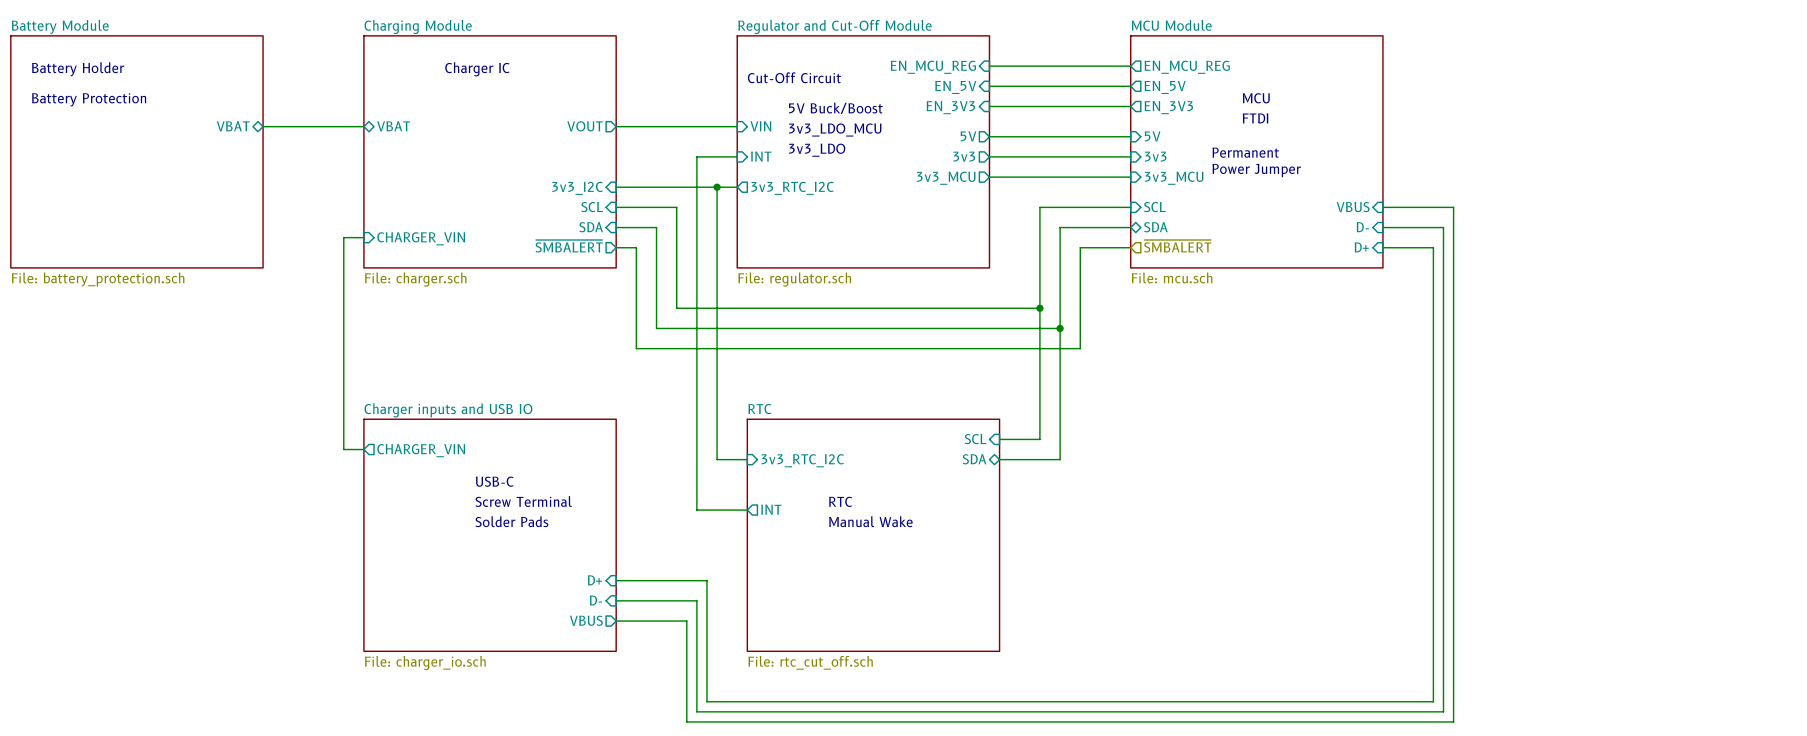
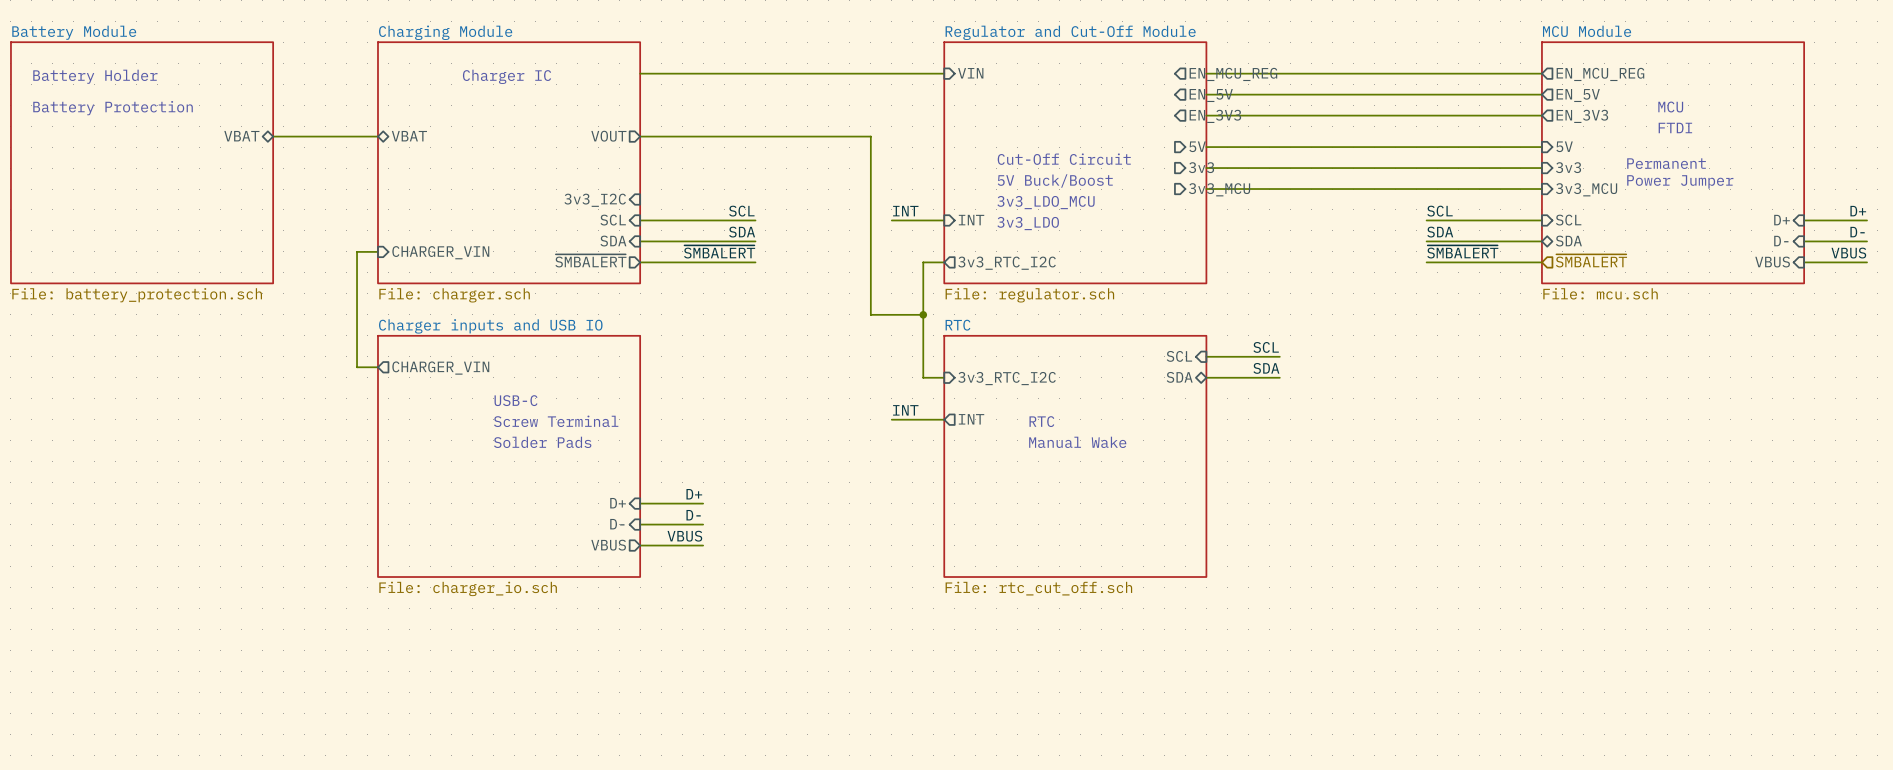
wire: none -> (640, 73) (944, 73)
wire: (989, 66) (1130, 66) -> none
wire: none -> (1206, 73) (1541, 73)
sheet pin: EN_MCU_REG (933, 67) -> none
sheet pin: none -> EN_MCU_REG (1600, 74)
text: Cut-Off Circuit (794, 77) -> none
wire: (989, 86) (1130, 86) -> none
wire: none -> (1206, 94) (1541, 94)
sheet pin: EN_5V (955, 87) -> none
sheet pin: none -> EN_5V (1578, 95)
text: MCU (1256, 98) -> none
text: none -> MCU (1670, 107)
wire: (989, 106) (1130, 106) -> none
wire: none -> (1206, 115) (1541, 115)
sheet pin: EN_3V3 (950, 107) -> none
sheet pin: none -> EN_3V3 (1582, 116)
text position: 5V Buck/Boost (835, 108) -> 5V Buck/Boost (1055, 180)
text: FTDI (1255, 118) -> none
text: none -> FTDI (1675, 127)
wire: none -> (765, 136) (870, 136) (870, 314) (923, 314)
sheet pin position: VIN (760, 126) -> VIN (970, 73)
text position: 3v3_LDO_MCU (835, 130) -> 3v3_LDO_MCU (1046, 202)
sheet pin: 5V (968, 136) -> none
wire: (989, 136) (1130, 136) -> none
wire: none -> (1206, 147) (1541, 147)
sheet pin: none -> 5V (1564, 146)
text: none -> Cut-Off Circuit (1064, 159)
text position: 3v3_LDO (817, 150) -> 3v3_LDO (1028, 223)
sheet Regulator and Cut-Off Module position: (863, 151) -> (1075, 162)
sheet MCU Module: File: mcu.sch (1256, 151) -> none
sheet MCU Module: none -> File: mcu.sch (1673, 162)
text: Permanent (1245, 152) -> none
text: none -> Permanent (1666, 163)
wire: (737, 156) (696, 156) (696, 510) (747, 510) -> none
sheet pin: INT (761, 156) -> none
sheet pin: 3v3 (964, 156) -> none
wire: (989, 156) (1130, 156) -> none
wire: none -> (1206, 168) (1541, 168)
sheet pin: none -> 3v3 (1568, 167)
text: Power Jumper (1256, 170) -> none
text: none -> Power Jumper (1680, 181)
wire: (989, 177) (1130, 177) -> none
wire: none -> (1206, 189) (1541, 189)
sheet pin: 3v3_MCU (946, 178) -> none
sheet pin: none -> 3v3_MCU (1586, 189)
wire: (616, 187) (737, 187) -> none
wire: (717, 187) (717, 459) (747, 459) -> none
junction: (717, 187) -> none
sheet pin: 3v3_RTC_I2C (792, 188) -> none
label: none -> SCL (741, 211)
label: none -> INT (905, 211)
label: none -> SCL (1439, 211)
label: none -> D+ (1858, 211)
wire: (676, 207) (676, 308) (1039, 308) -> (703, 220) (755, 220)
wire: none -> (891, 220) (944, 220)
sheet pin: none -> INT (971, 220)
wire: (1130, 207) (1039, 207) (1039, 439) (999, 439) -> none
sheet pin: SCL (1154, 207) -> none
sheet pin: VBUS (1353, 207) -> none
wire: none -> (1426, 220) (1437, 220)
wire: (1453, 207) (1453, 721) (686, 721) (686, 621) (616, 621) -> (1510, 220) (1541, 220)
sheet pin: none -> SCL (1568, 220)
sheet pin: none -> D+ (1782, 220)
wire: none -> (1804, 220) (1867, 220)
label: none -> SDA (742, 232)
label: none -> SDA (1440, 232)
label: none -> D- (1857, 232)
wire: (656, 227) (656, 328) (1060, 328) -> (682, 241) (755, 241)
wire: (1130, 227) (1060, 227) (1060, 459) (999, 459) -> none
sheet pin: SDA (1155, 227) -> none
sheet pin: D- (1362, 227) -> none
wire: none -> (1426, 241) (1437, 241)
wire: (1443, 227) (1443, 711) (696, 711) (696, 600) (616, 600) -> (1500, 241) (1541, 241)
sheet pin: none -> SDA (1568, 241)
sheet pin: none -> D- (1781, 241)
wire: none -> (1804, 241) (1867, 241)
label: none -> ~{SMBALERT} (719, 251)
label: none -> ~{SMBALERT} (1462, 251)
label: none -> VBUS (1848, 253)
hierarchical label: ~{SMBALERT} (1177, 246) -> none
hierarchical label: none -> ~{SMBALERT} (1591, 260)
wire: (636, 247) (636, 348) (1080, 348) (1080, 247) (1130, 247) -> (661, 262) (755, 262)
wire: none -> (944, 262) (923, 262) (923, 377) (944, 377)
sheet pin: D+ (1361, 247) -> none
wire: none -> (1426, 262) (1437, 262)
wire: (1433, 247) (1433, 701) (706, 701) (706, 580) (616, 580) -> (1489, 262) (1541, 262)
sheet pin: none -> VBUS (1772, 262)
wire: none -> (1804, 262) (1867, 262)
sheet pin: none -> 3v3_RTC_I2C (1007, 263)
junction: none -> (923, 314)
junction: (1039, 308) -> none
junction: (1060, 328) -> none
label: none -> SCL (1266, 347)
sheet pin: none -> SCL (1179, 356)
wire: none -> (1206, 356) (1279, 356)
wire: (343, 348) (343, 449) (363, 449) -> (357, 367) (377, 367)
label: none -> SDA (1266, 368)
sheet pin: none -> SDA (1179, 377)
wire: none -> (1206, 377) (1279, 377)
sheet pin: none -> 3v3_RTC_I2C (1007, 378)
label: none -> INT (905, 410)
sheet pin: none -> INT (971, 419)
wire: none -> (891, 419) (944, 419)
sheet pin: SCL (975, 439) -> none
sheet pin position: CHARGER_VIN (421, 450) -> CHARGER_VIN (440, 368)
sheet pin: SDA (974, 459) -> none
sheet pin: 3v3_RTC_I2C (802, 460) -> none
label: none -> D+ (694, 494)
wire: none -> (640, 503) (703, 503)
text position: USB-C (494, 481) -> USB-C (516, 400)
label: none -> D- (693, 515)
wire: none -> (640, 524) (703, 524)
text position: Screw Terminal (523, 501) -> Screw Terminal (556, 421)
text position: RTC (840, 501) -> RTC (1041, 421)
sheet pin: INT (771, 509) -> none
label: none -> VBUS (684, 536)
wire: none -> (640, 545) (703, 545)
text position: Solder Pads (511, 521) -> Solder Pads (542, 442)
text position: Manual Wake (870, 521) -> Manual Wake (1077, 442)
sheet Charger inputs and USB IO position: (490, 535) -> (509, 456)
sheet RTC position: (873, 535) -> (1075, 456)
sheet pin position: D+ (594, 580) -> D+ (618, 503)
sheet pin position: D- (595, 600) -> D- (617, 524)
sheet pin position: VBUS (586, 620) -> VBUS (608, 545)

